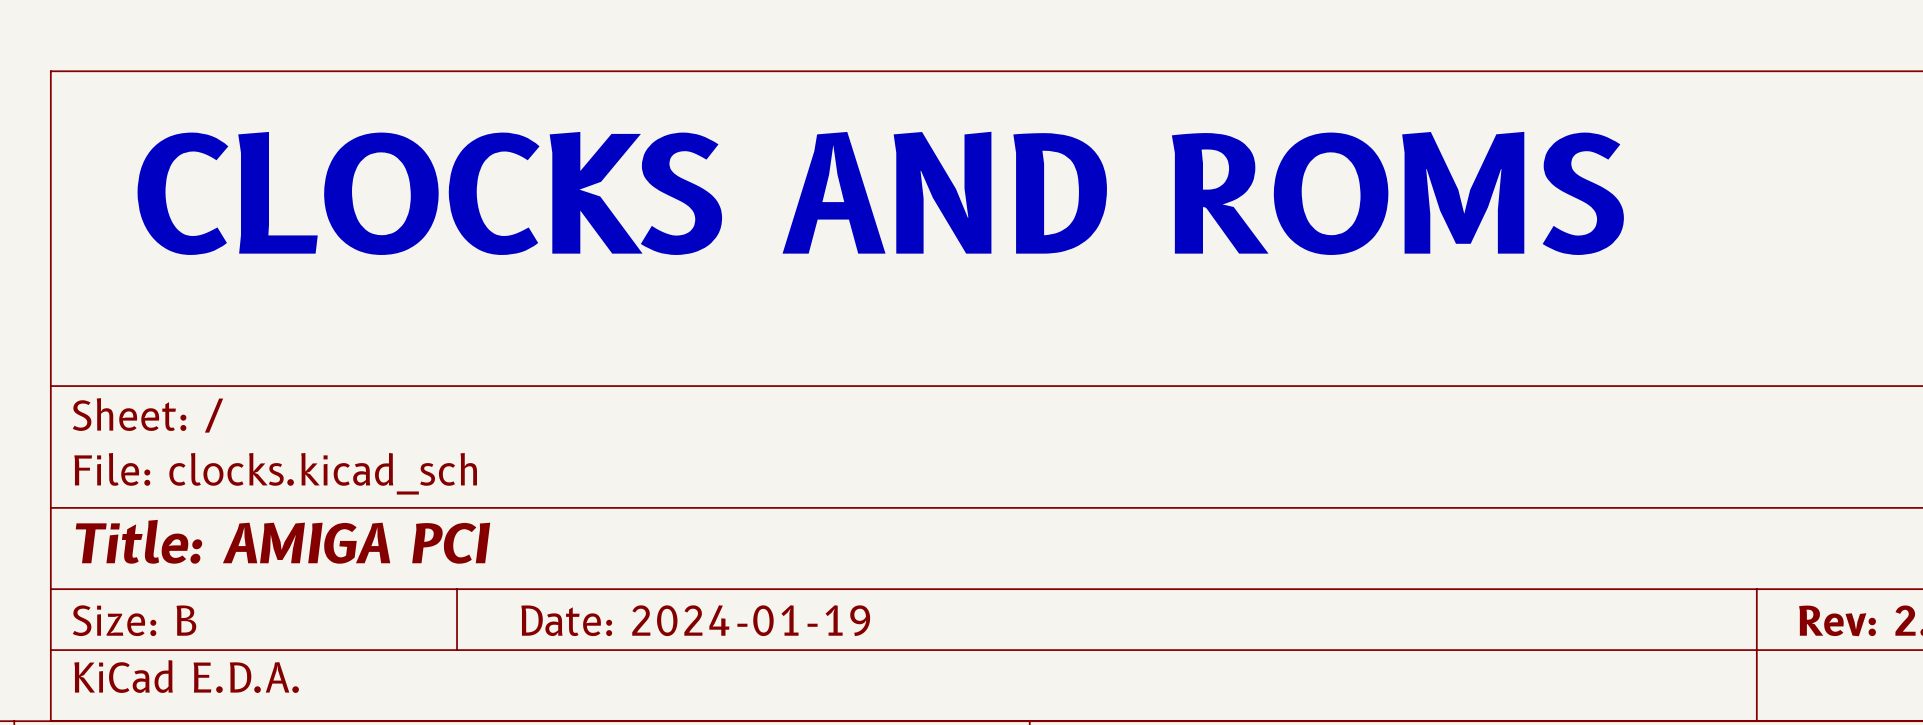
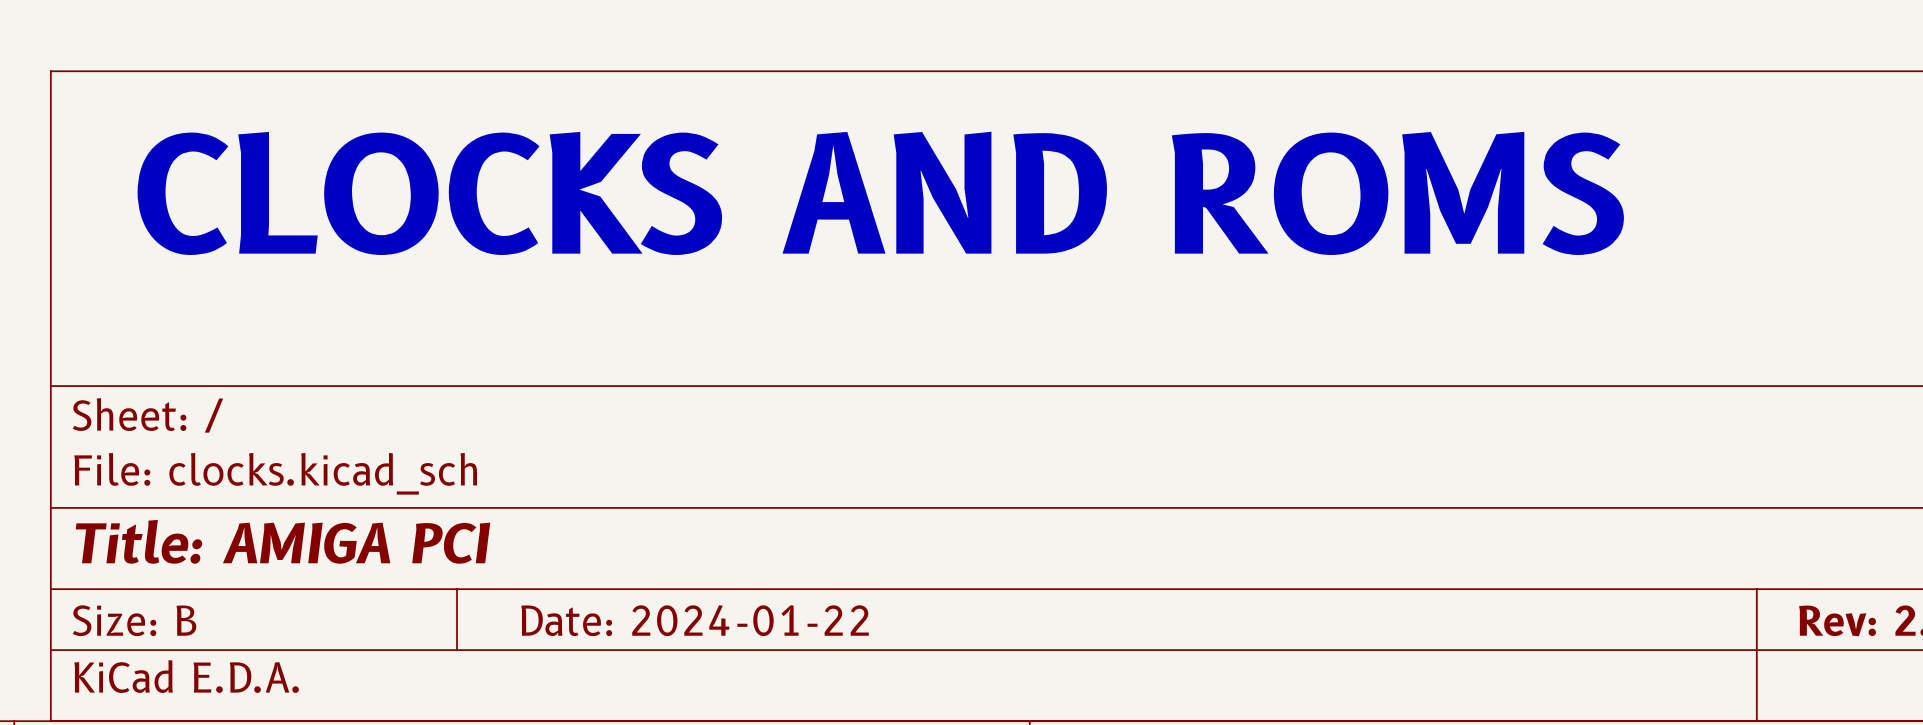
title block: Date: 2024-01-19 (695, 620) -> Date: 2024-01-22 (695, 620)

